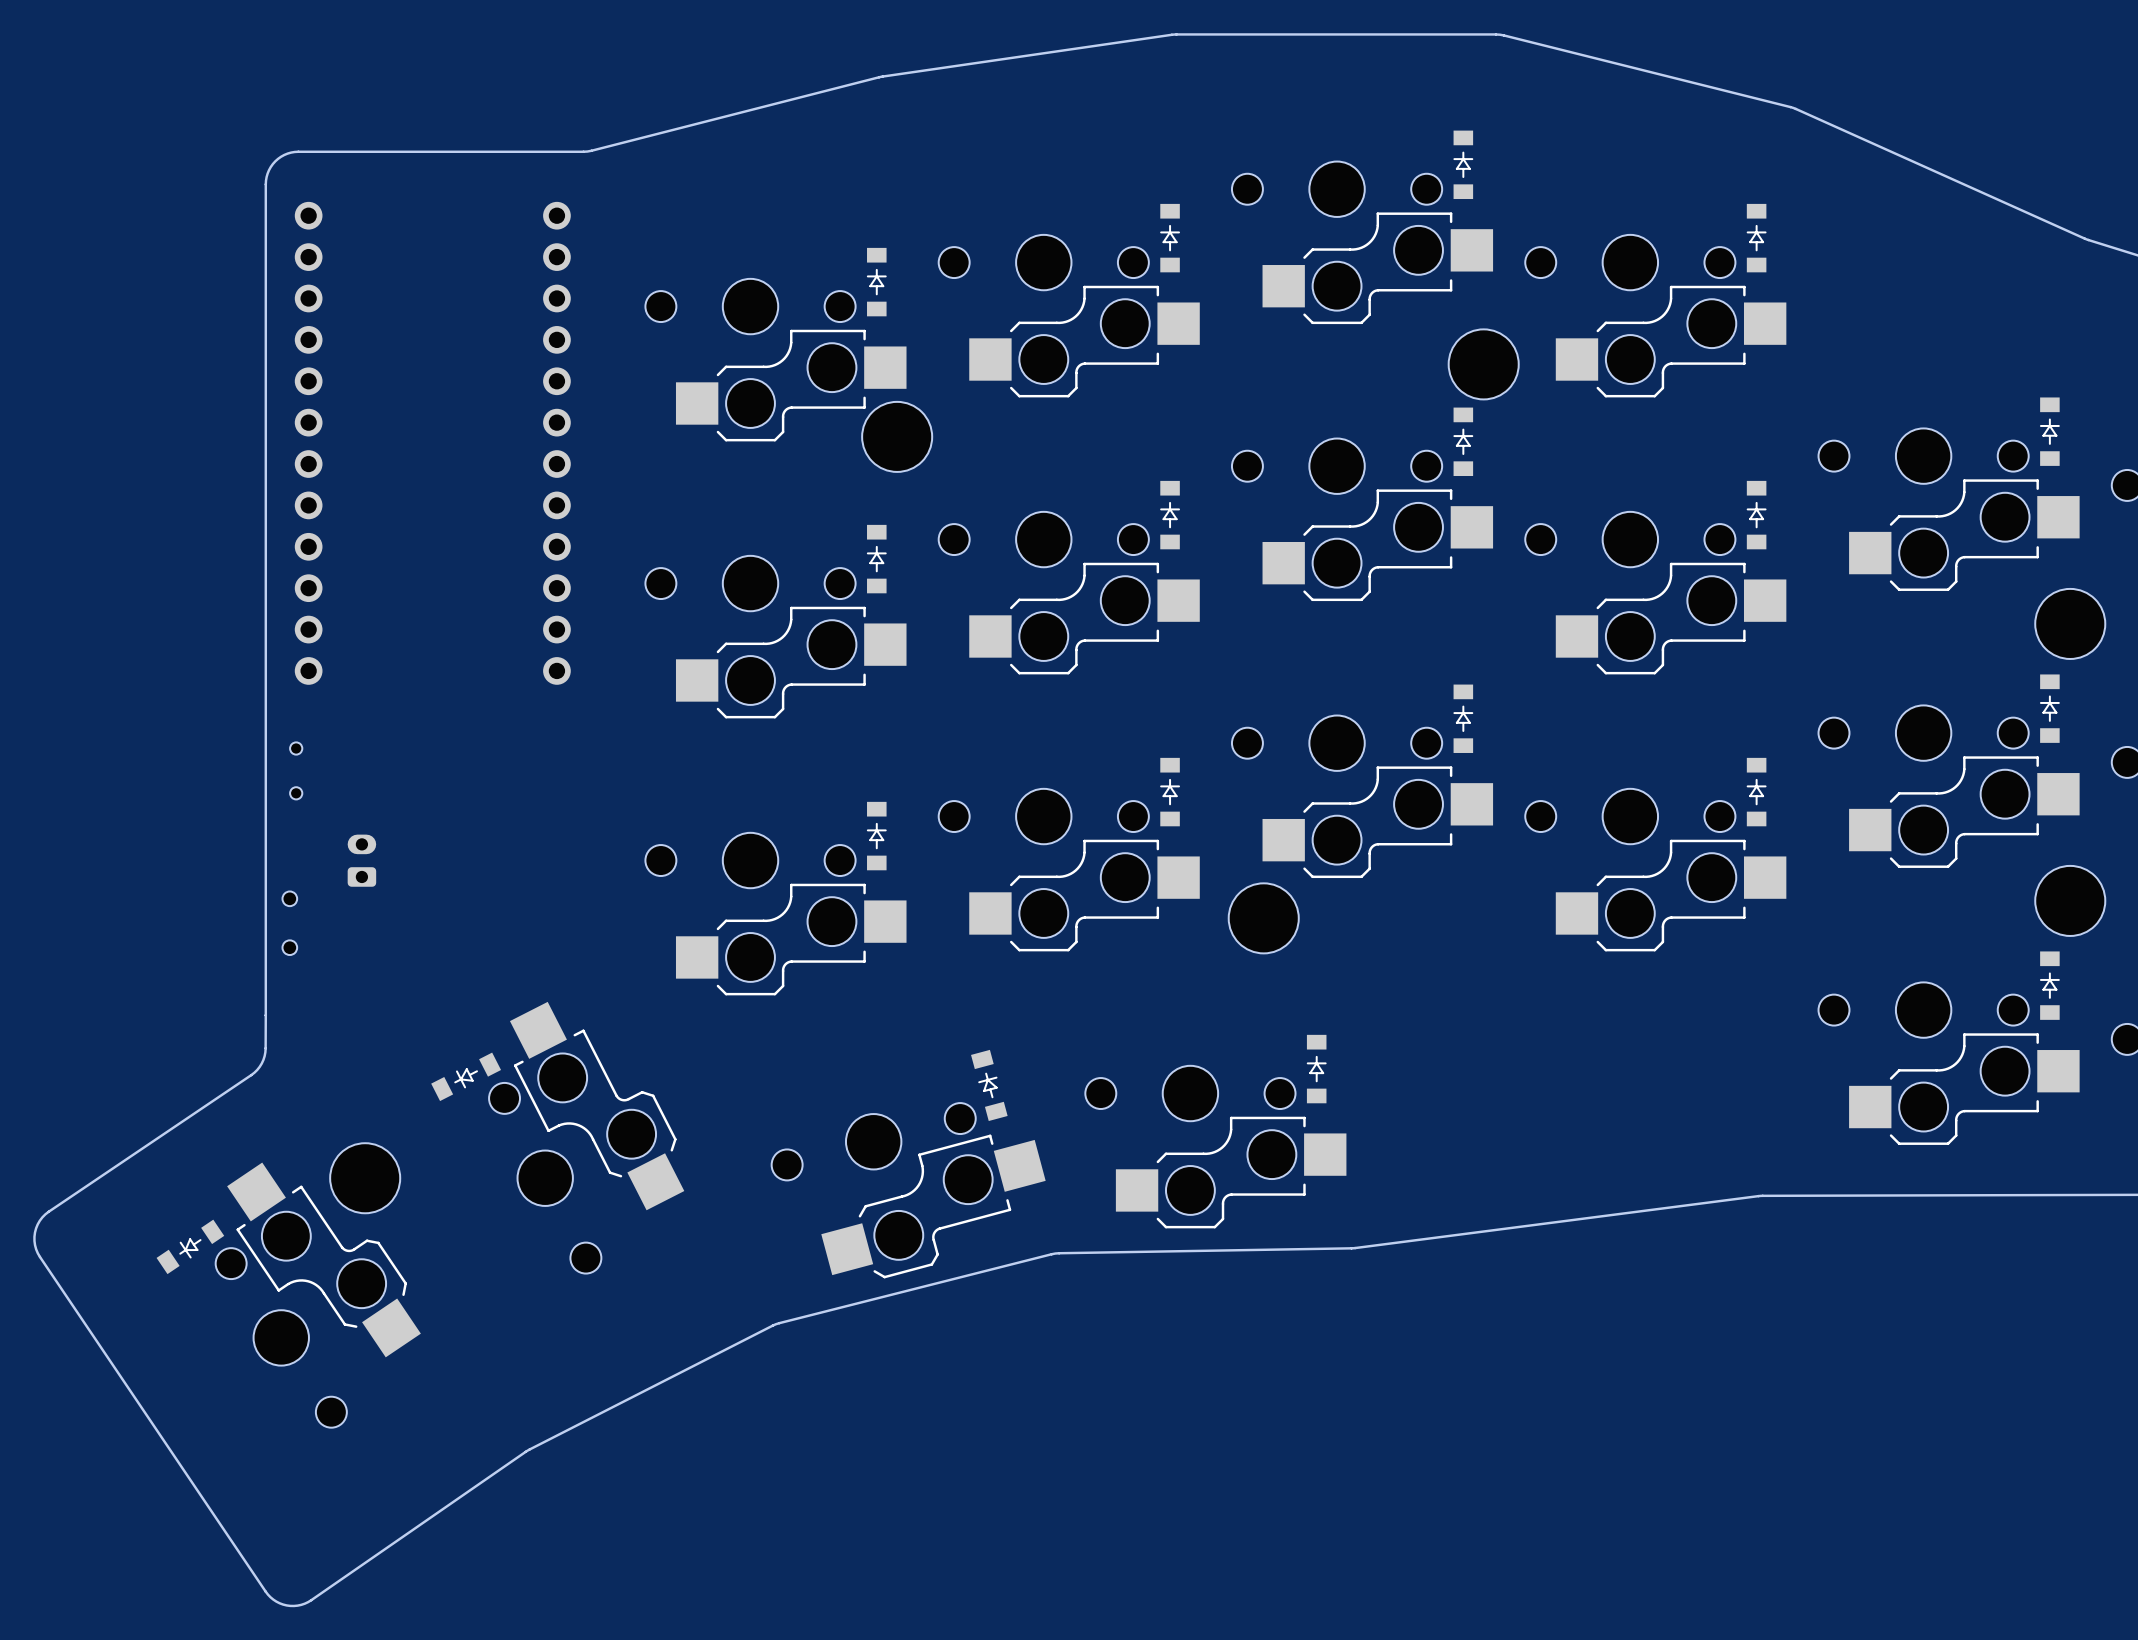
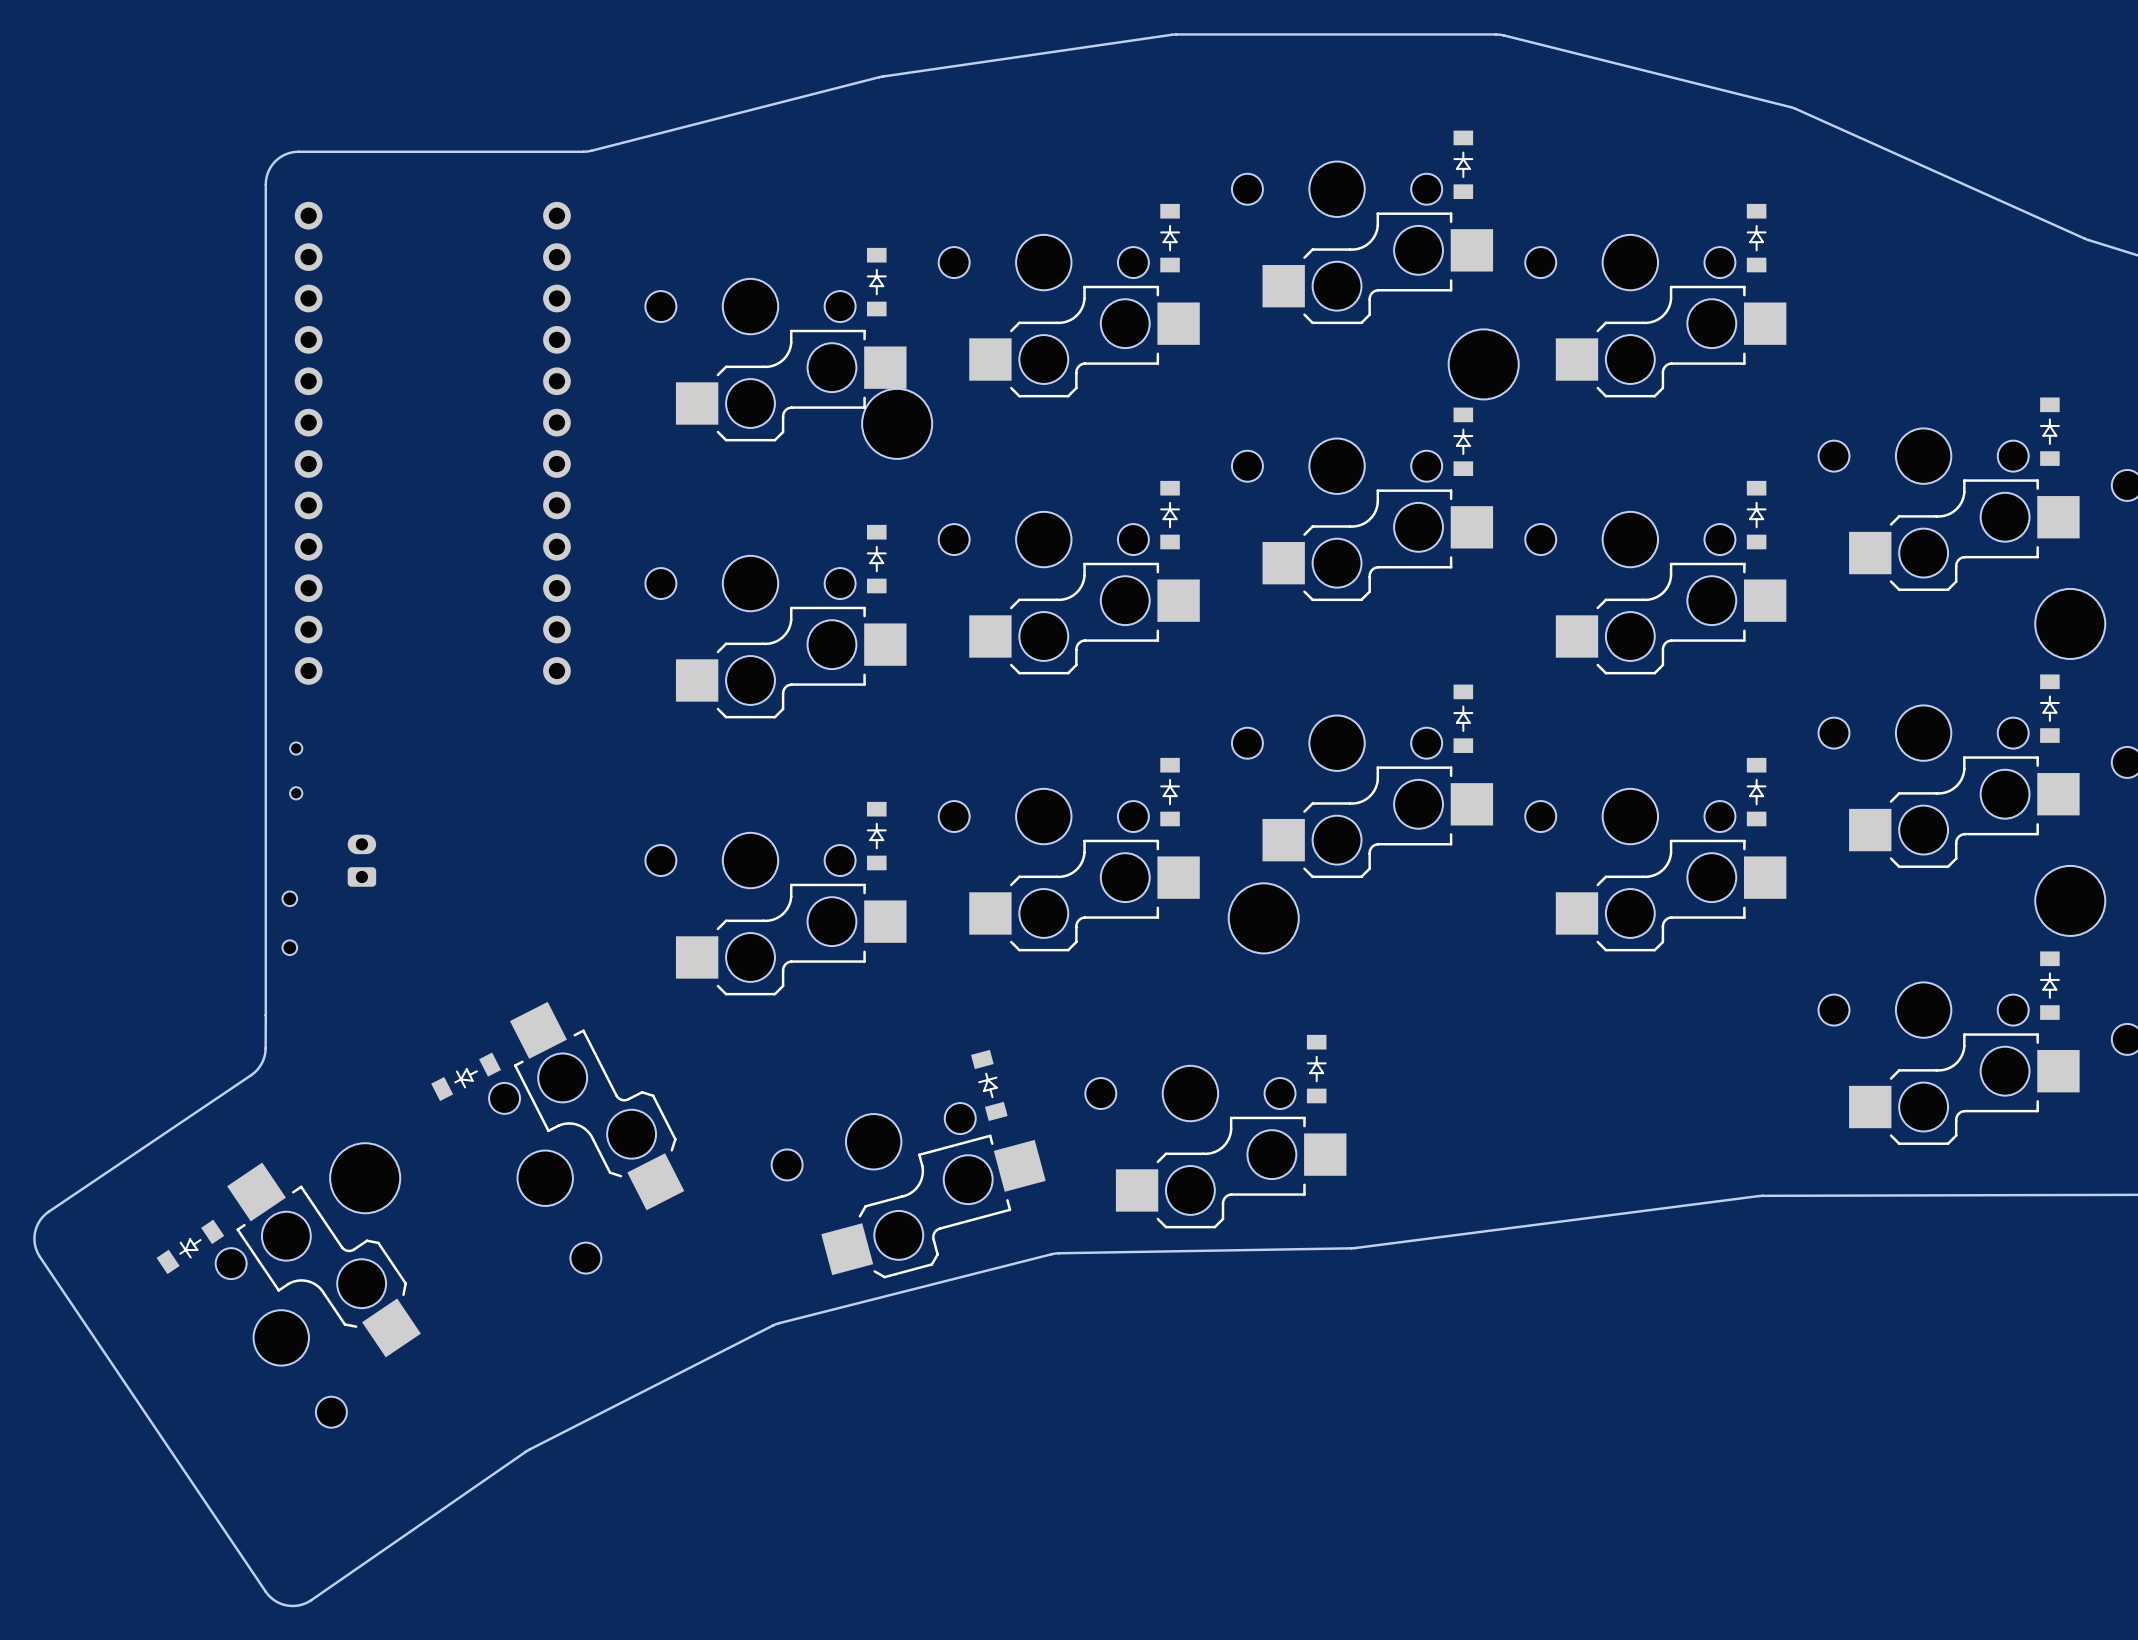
part position: (897, 436) -> (897, 423)

